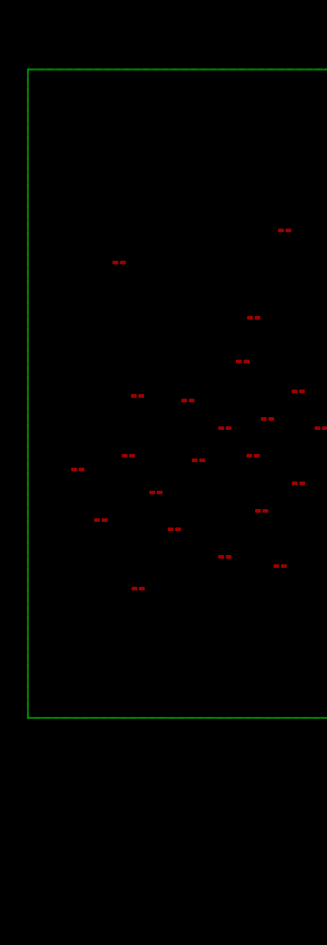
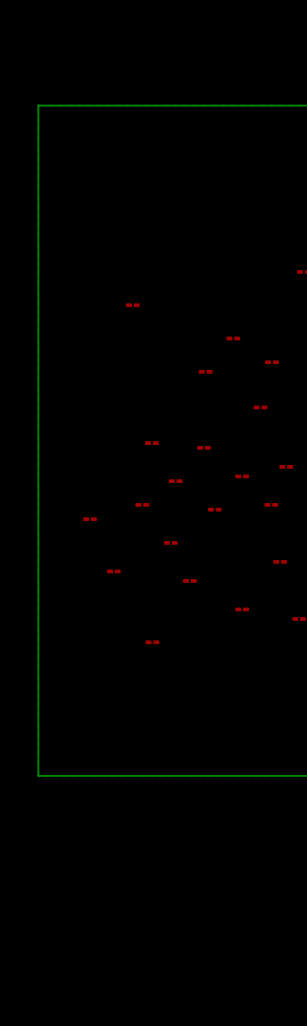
part: none -> (233, 338)
part: none -> (205, 371)
part: none -> (175, 481)

